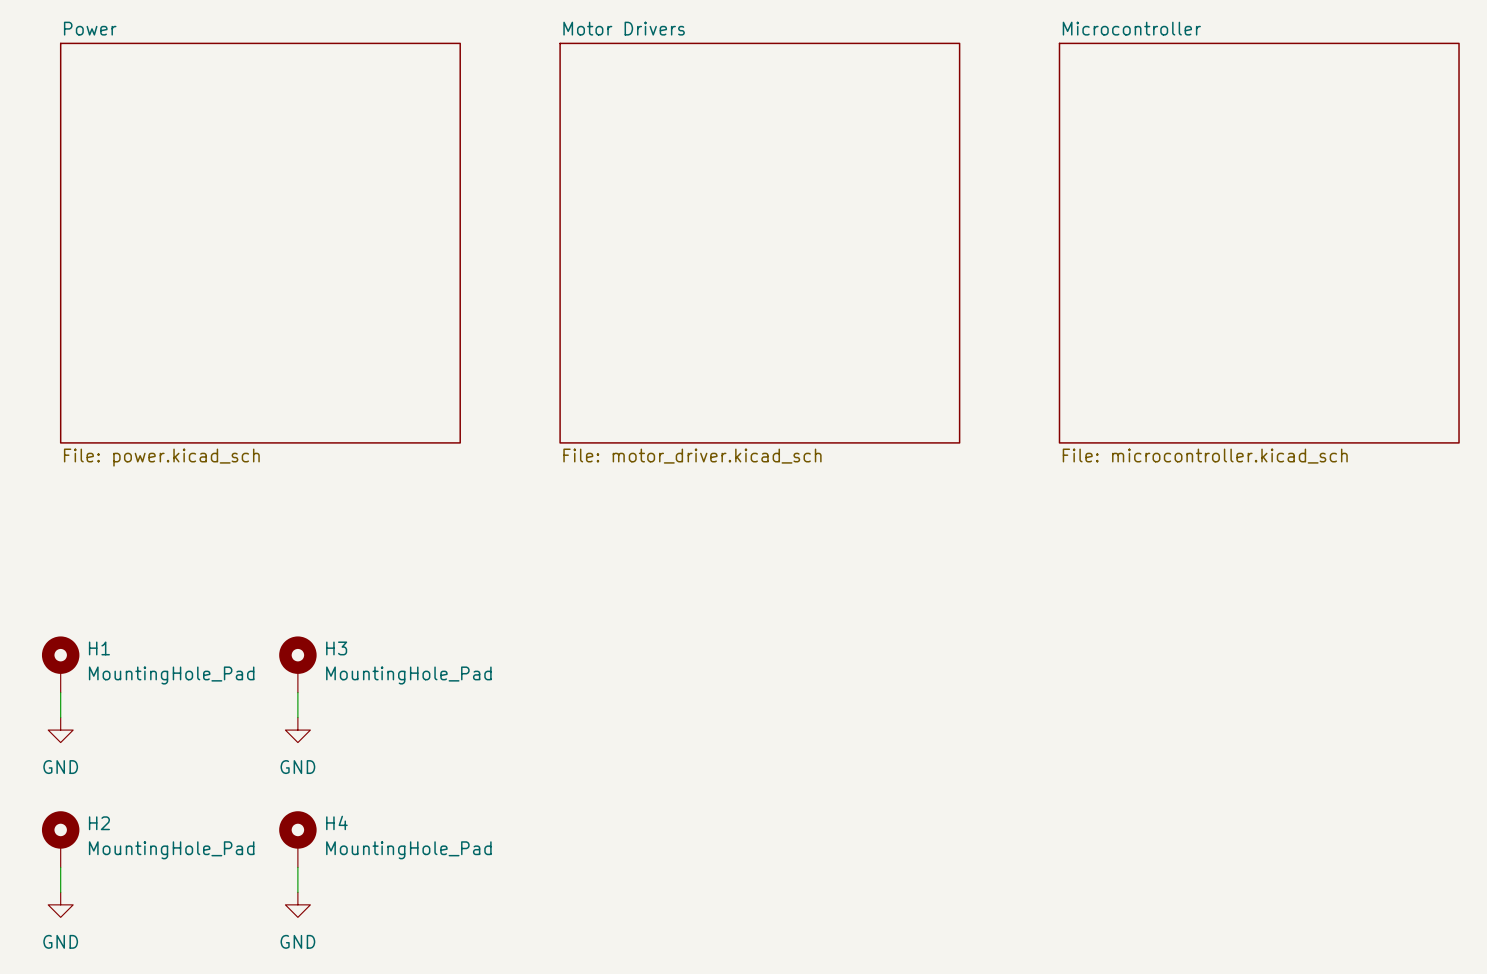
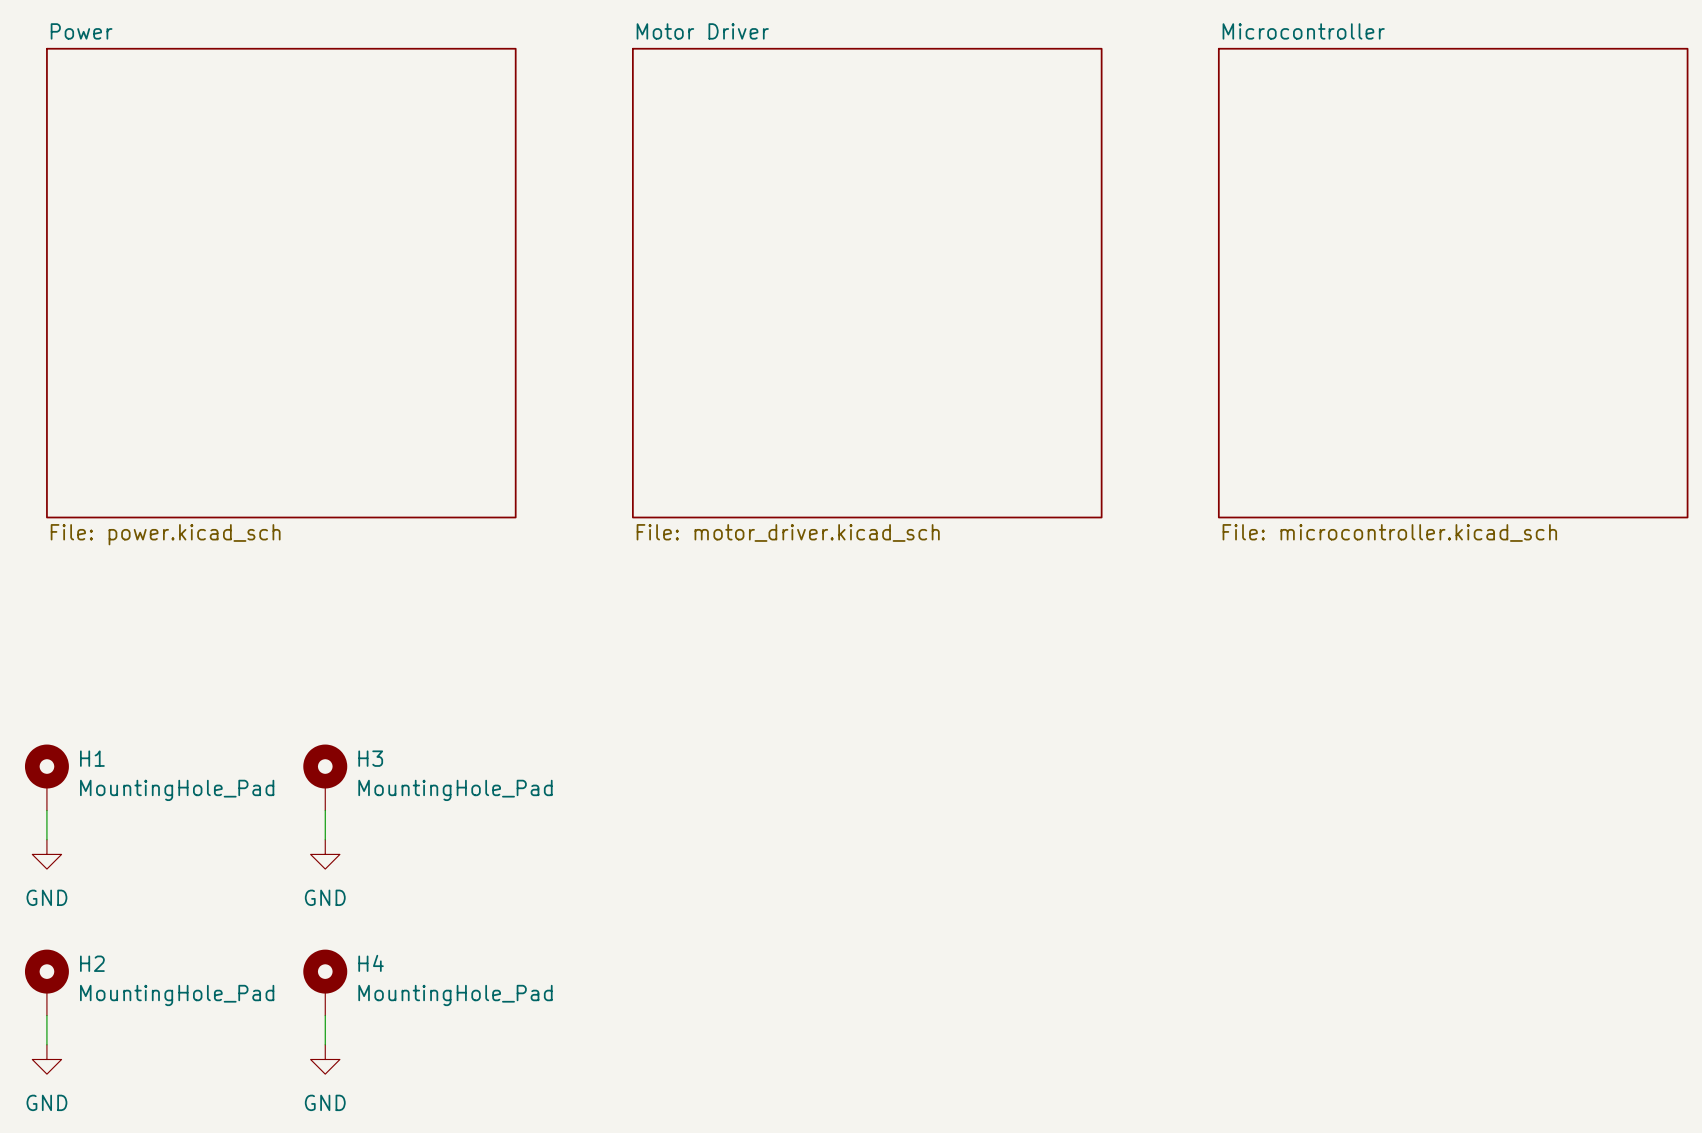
sheet Motor Drivers name: Motor Drivers (624, 28) -> Motor Driver (702, 31)

